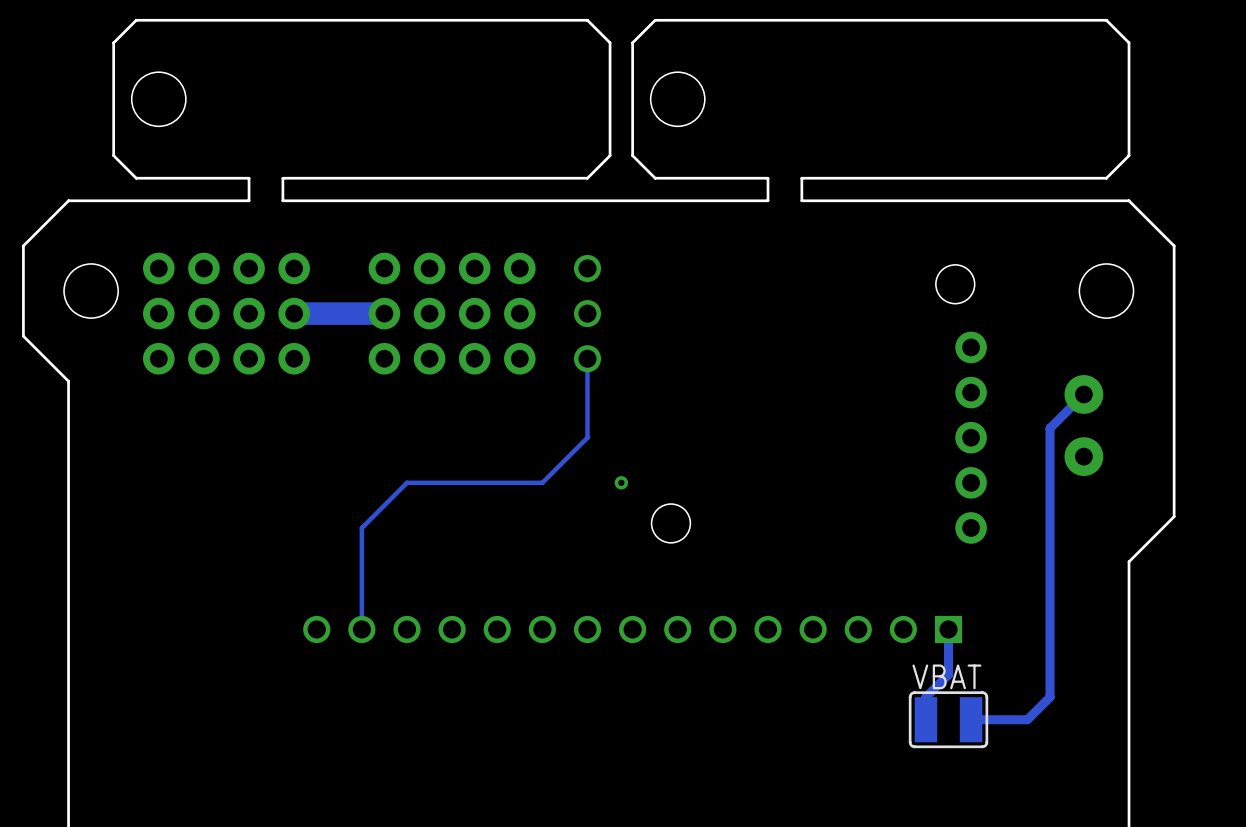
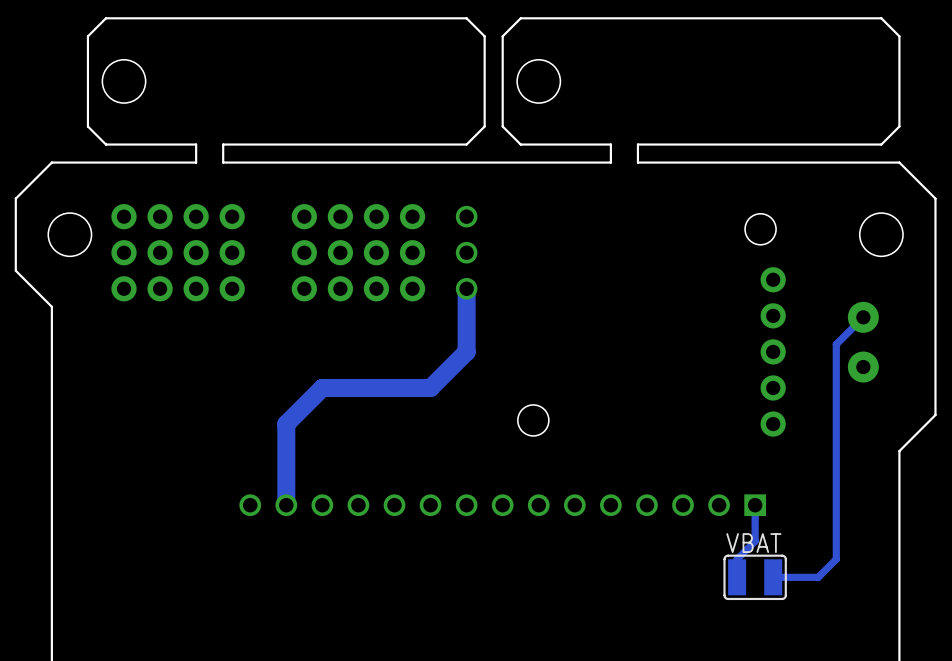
track: (384, 313) (294, 313) -> none
track width: thin (587, 358) (587, 437) (542, 482) (406, 482) (361, 527) (361, 629) -> thick (466, 288) (466, 351) (430, 387) (322, 387) (286, 424) (286, 505)
via: (621, 482) -> none

